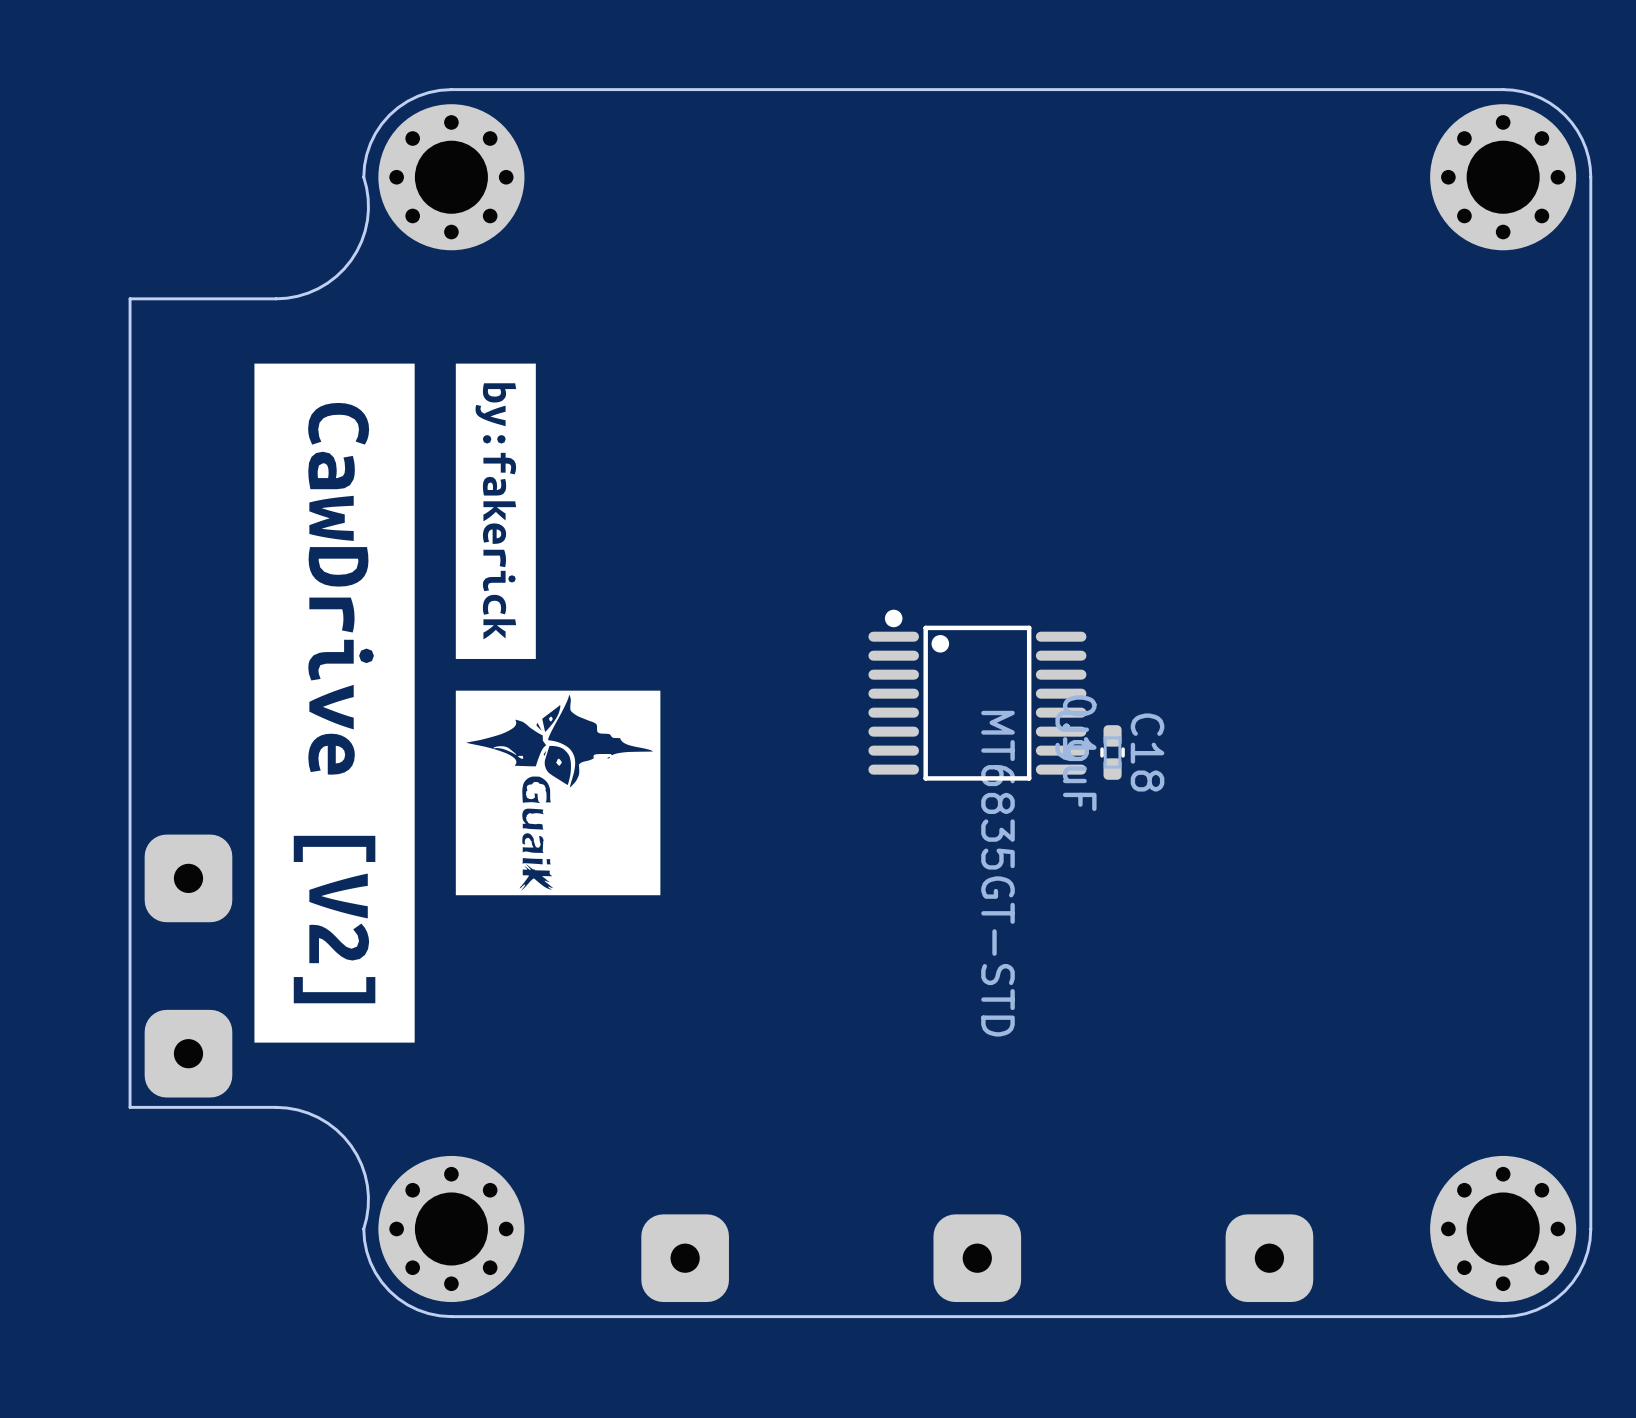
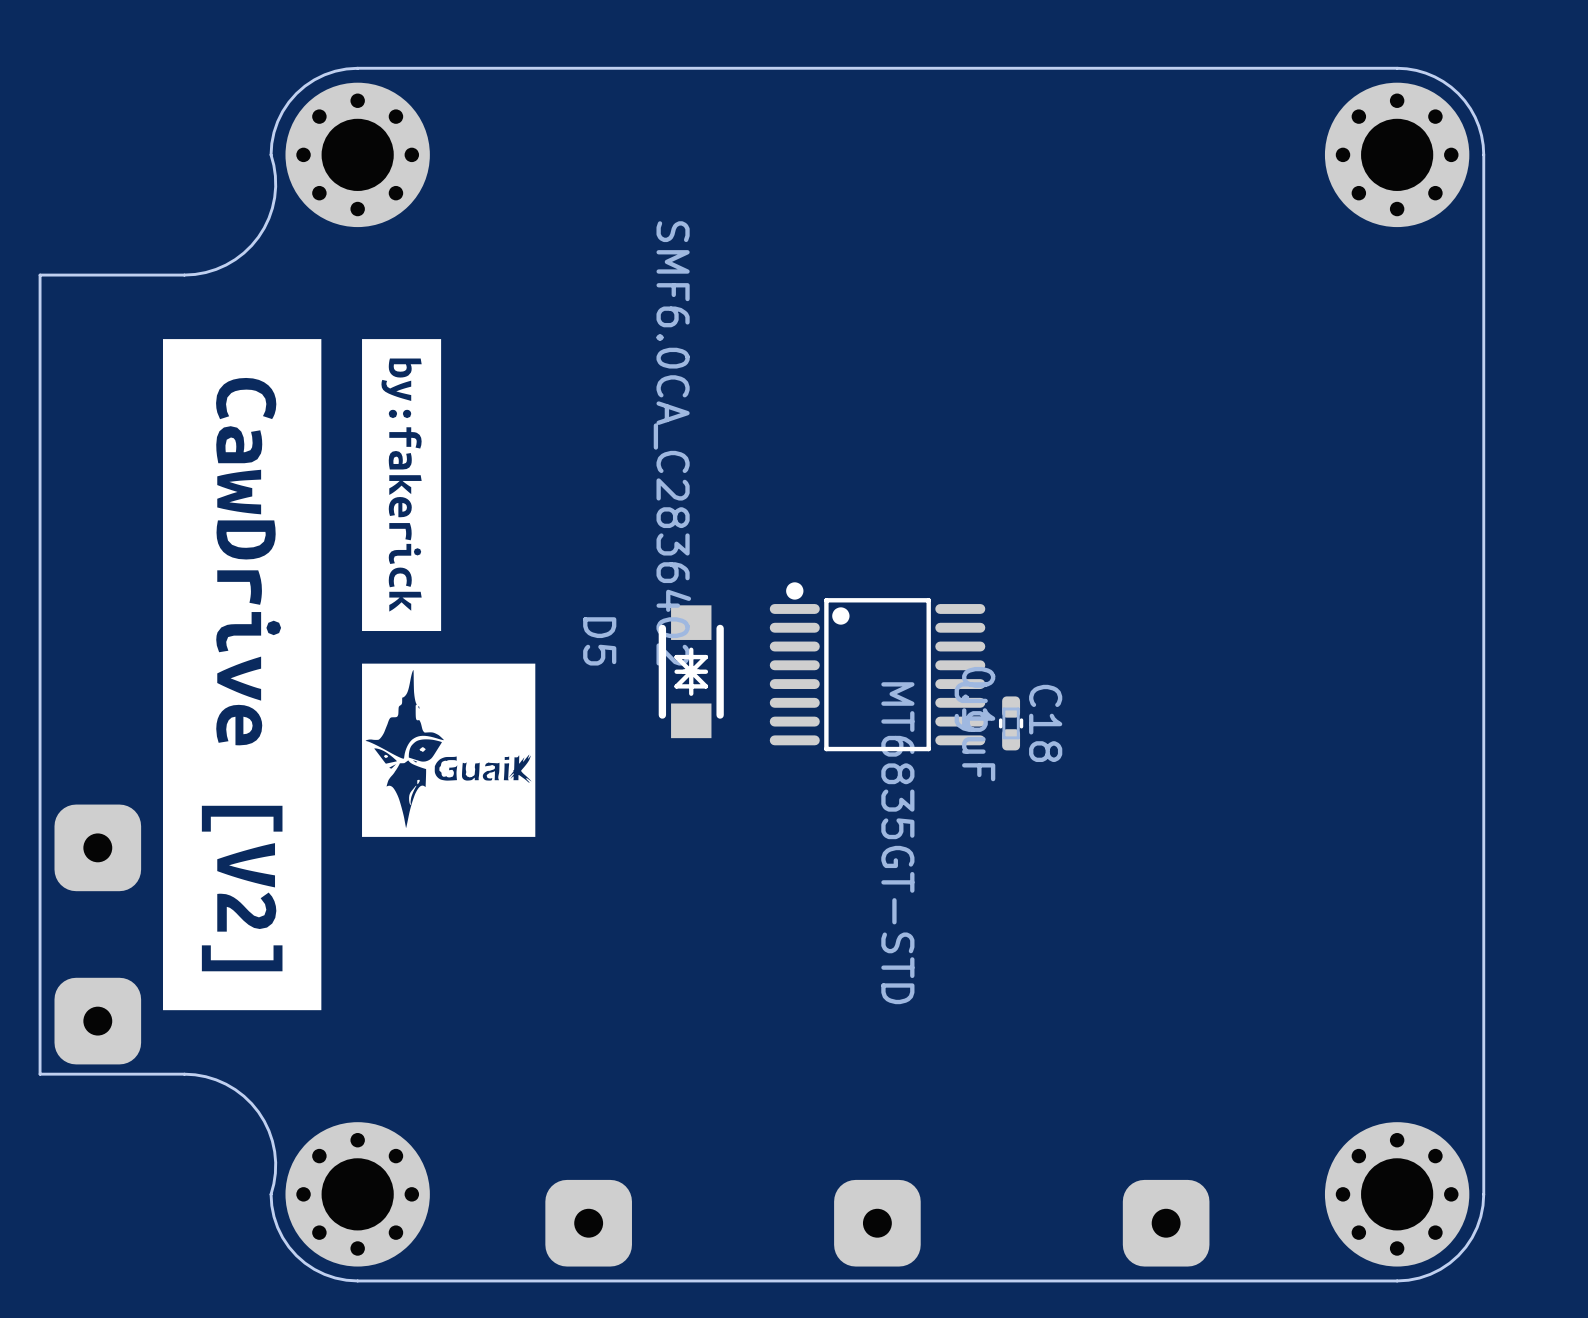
drawing shape: [455, 690, 661, 896] -> [362, 663, 536, 837]
D5: none -> SMF6.0CA_C2836402 (691, 671)

